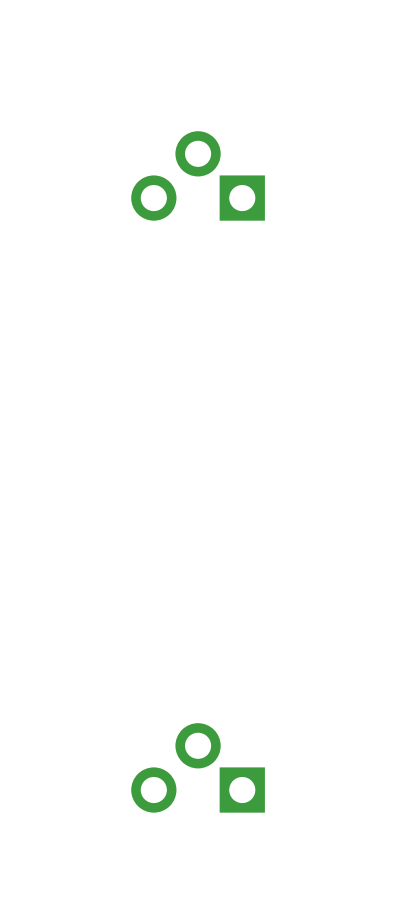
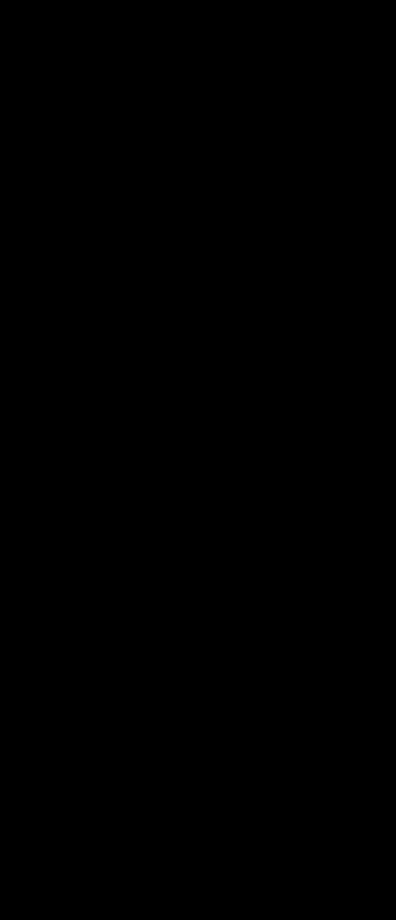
part: (198, 175) -> none
part: (198, 767) -> none

